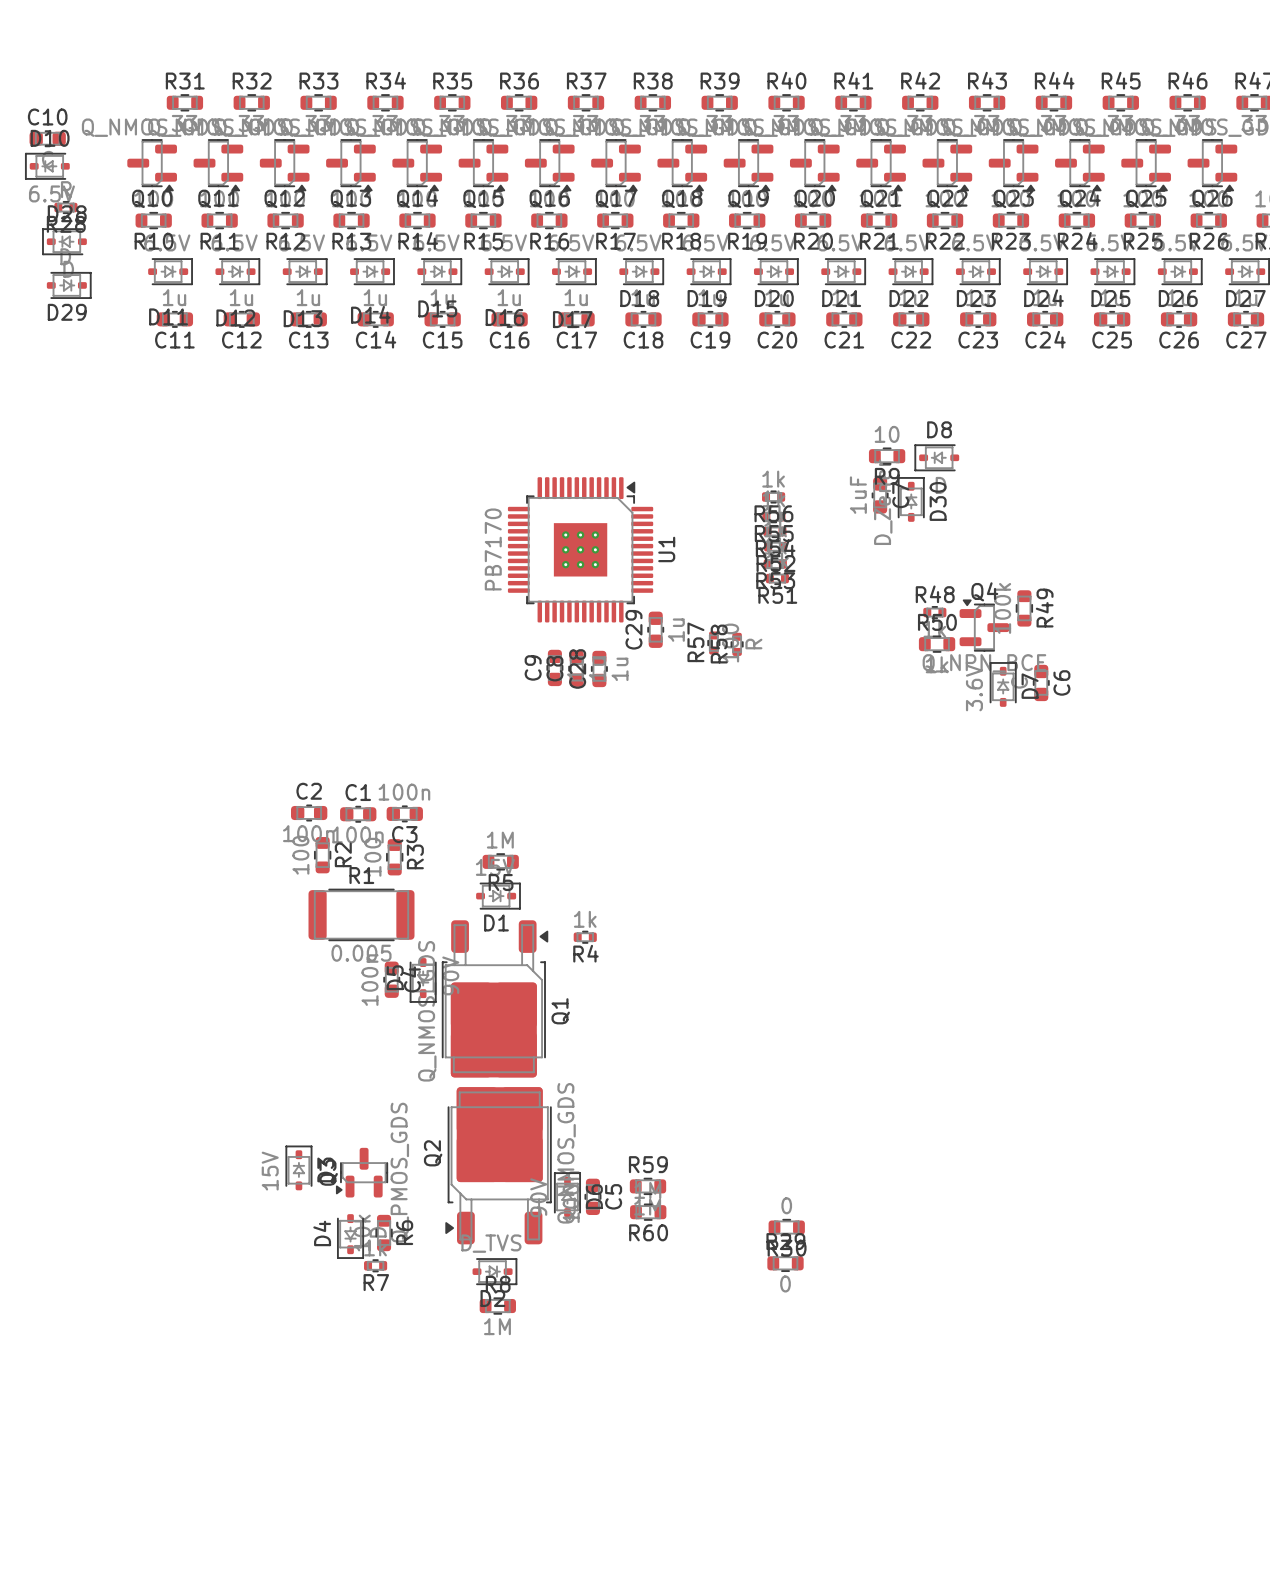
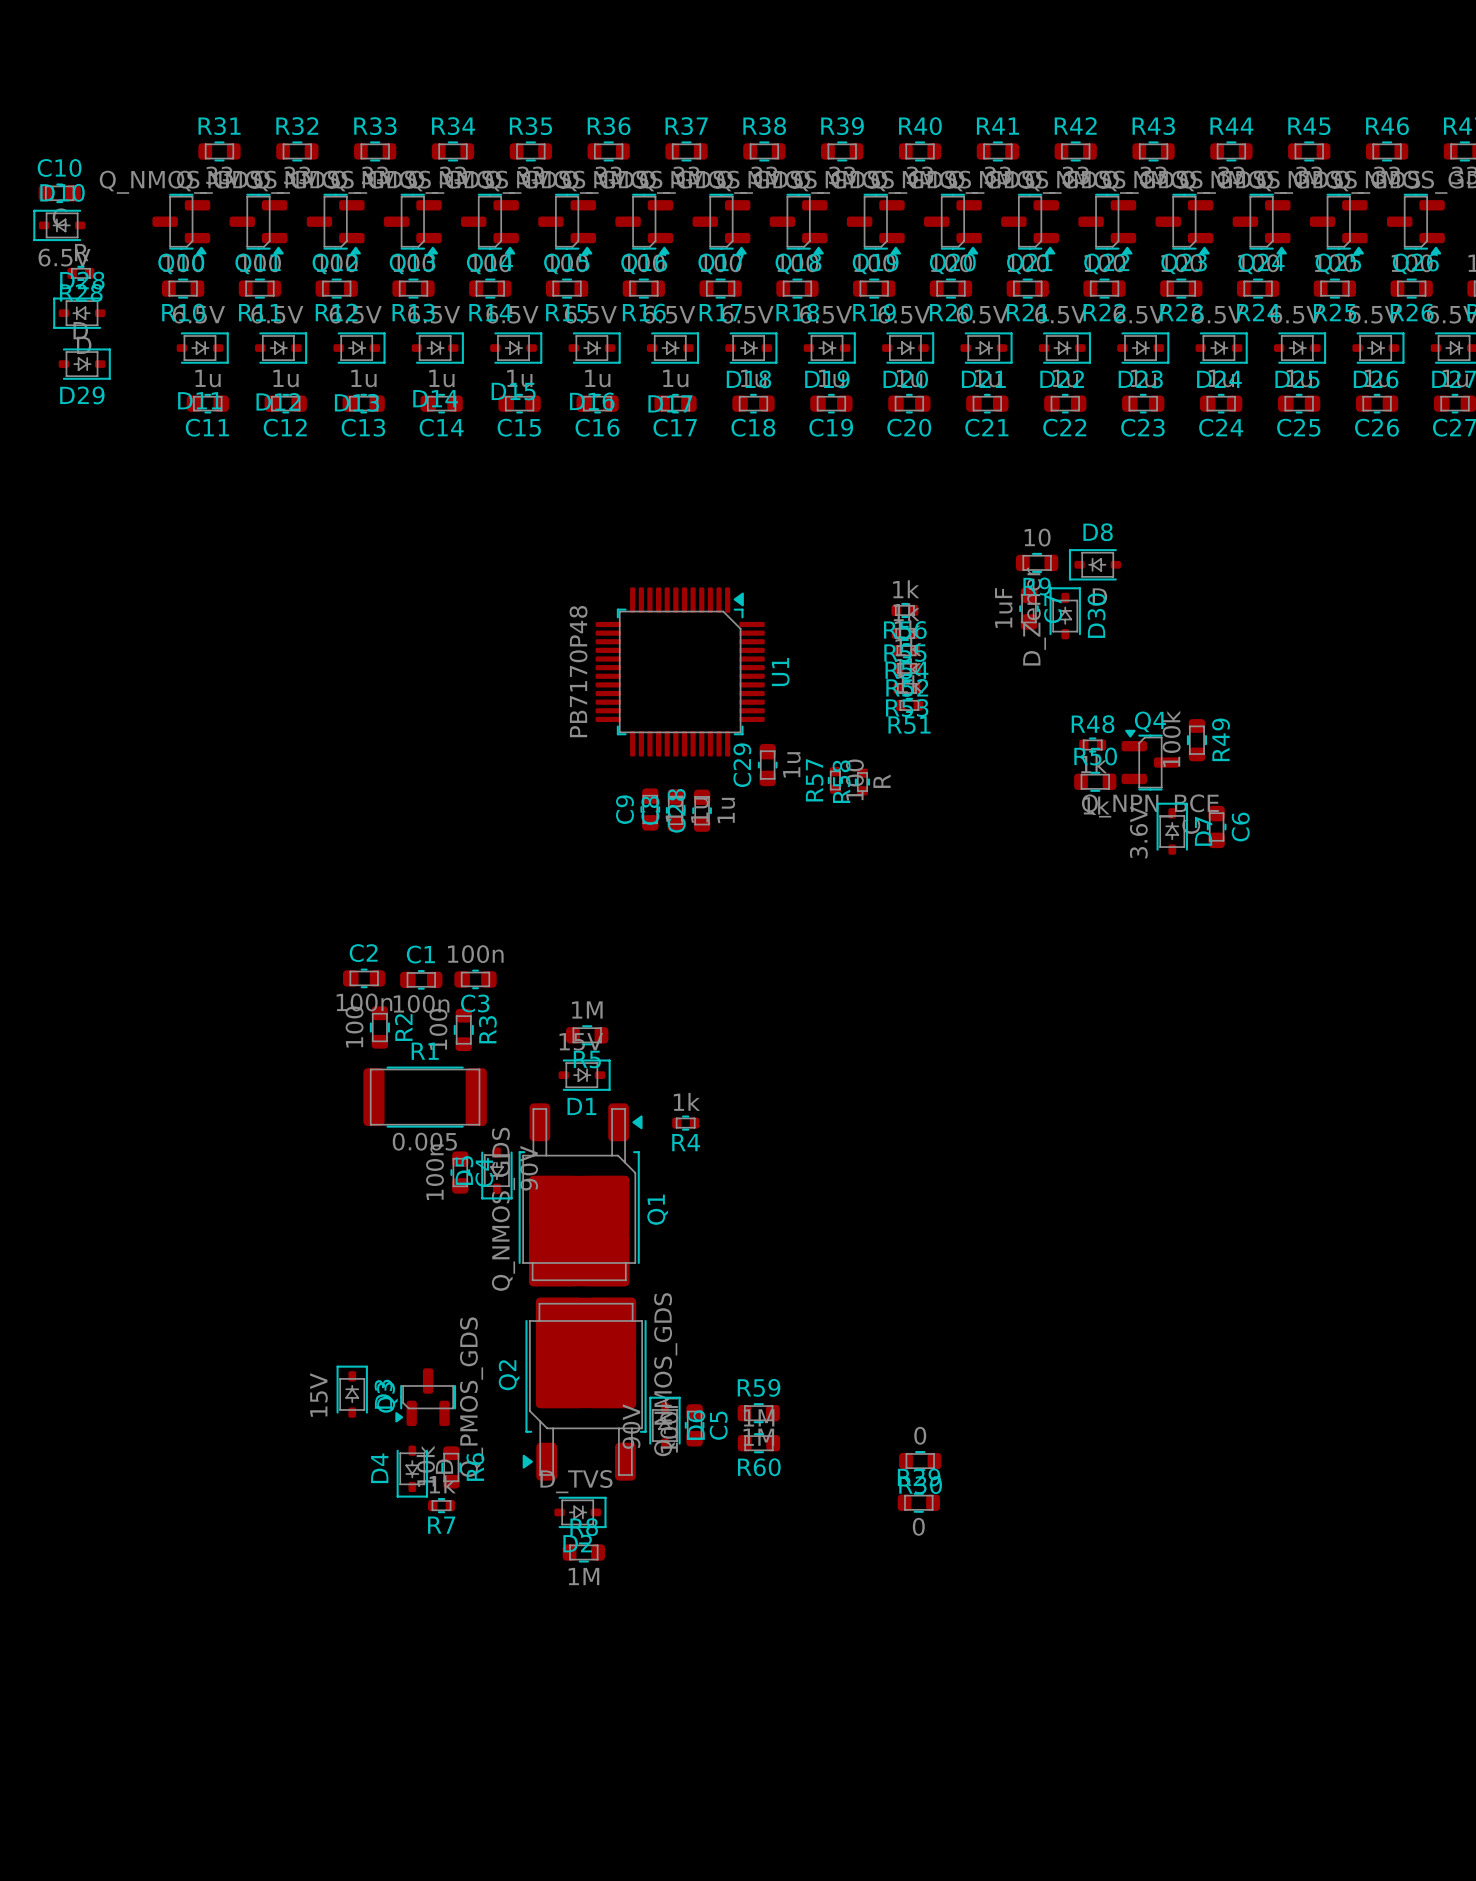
U1 footprint: [507, 477, 654, 623] -> [595, 587, 765, 757]
U1 value: PB7170 (493, 549) -> PB7170P48 (578, 671)

